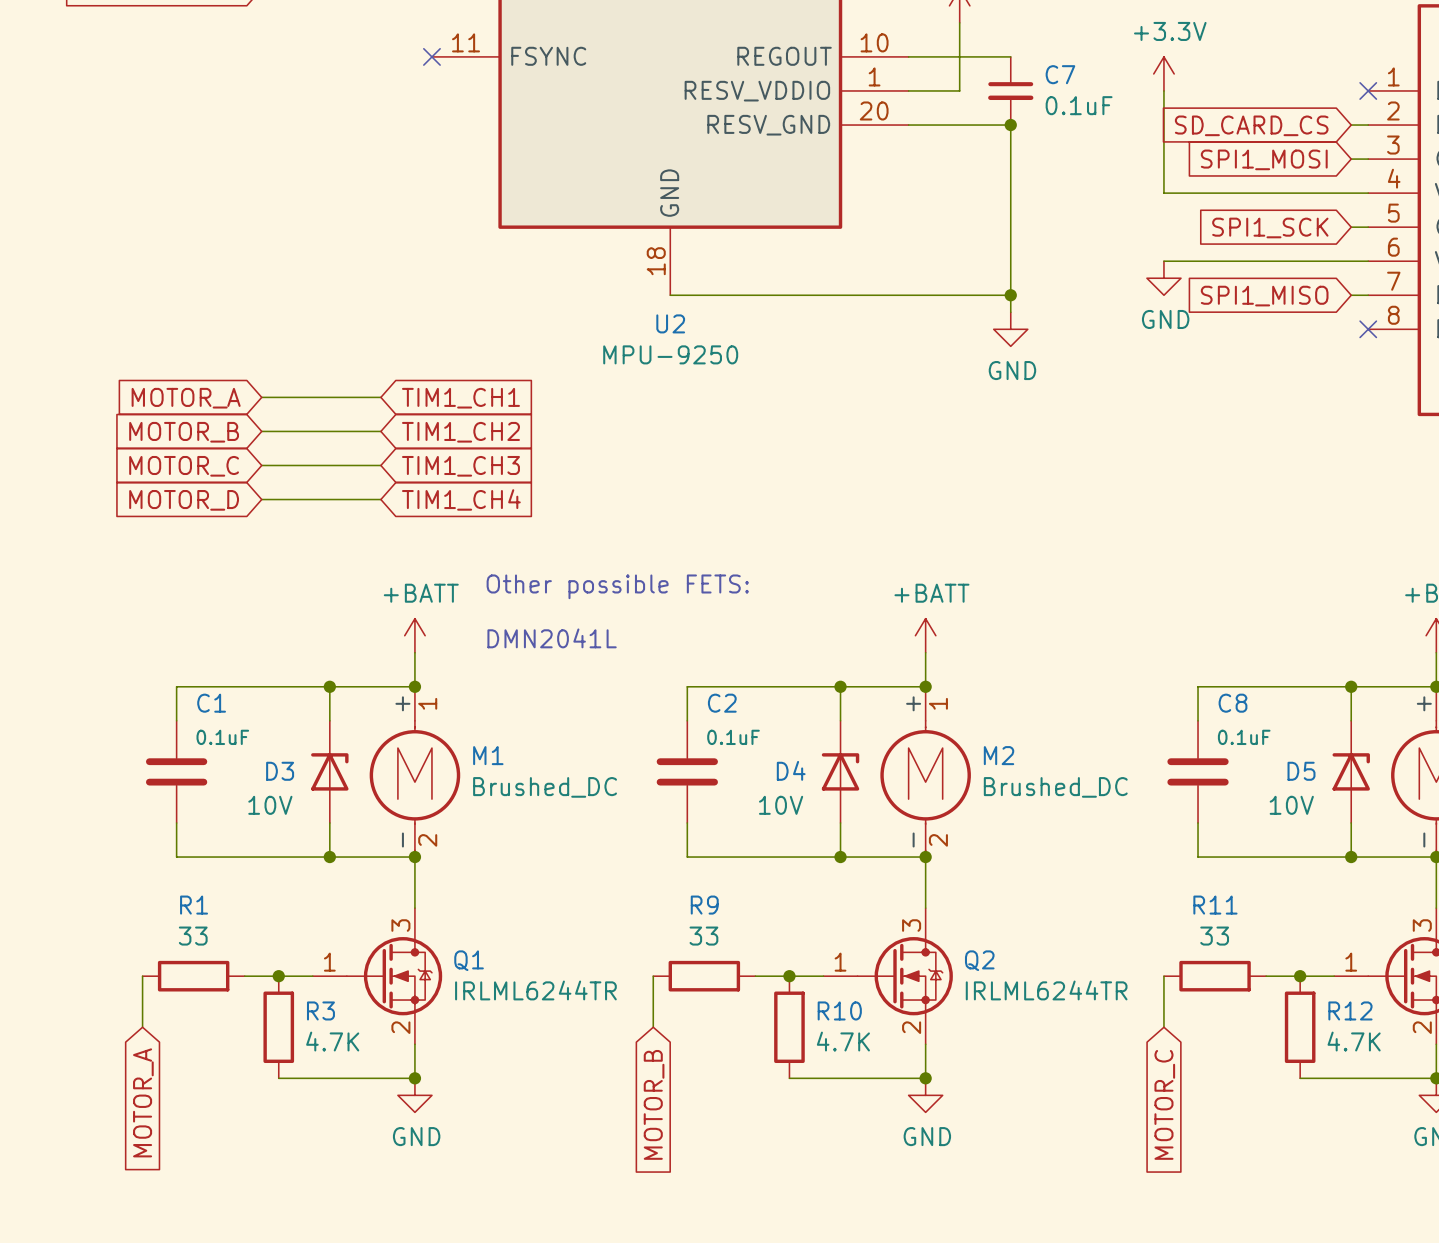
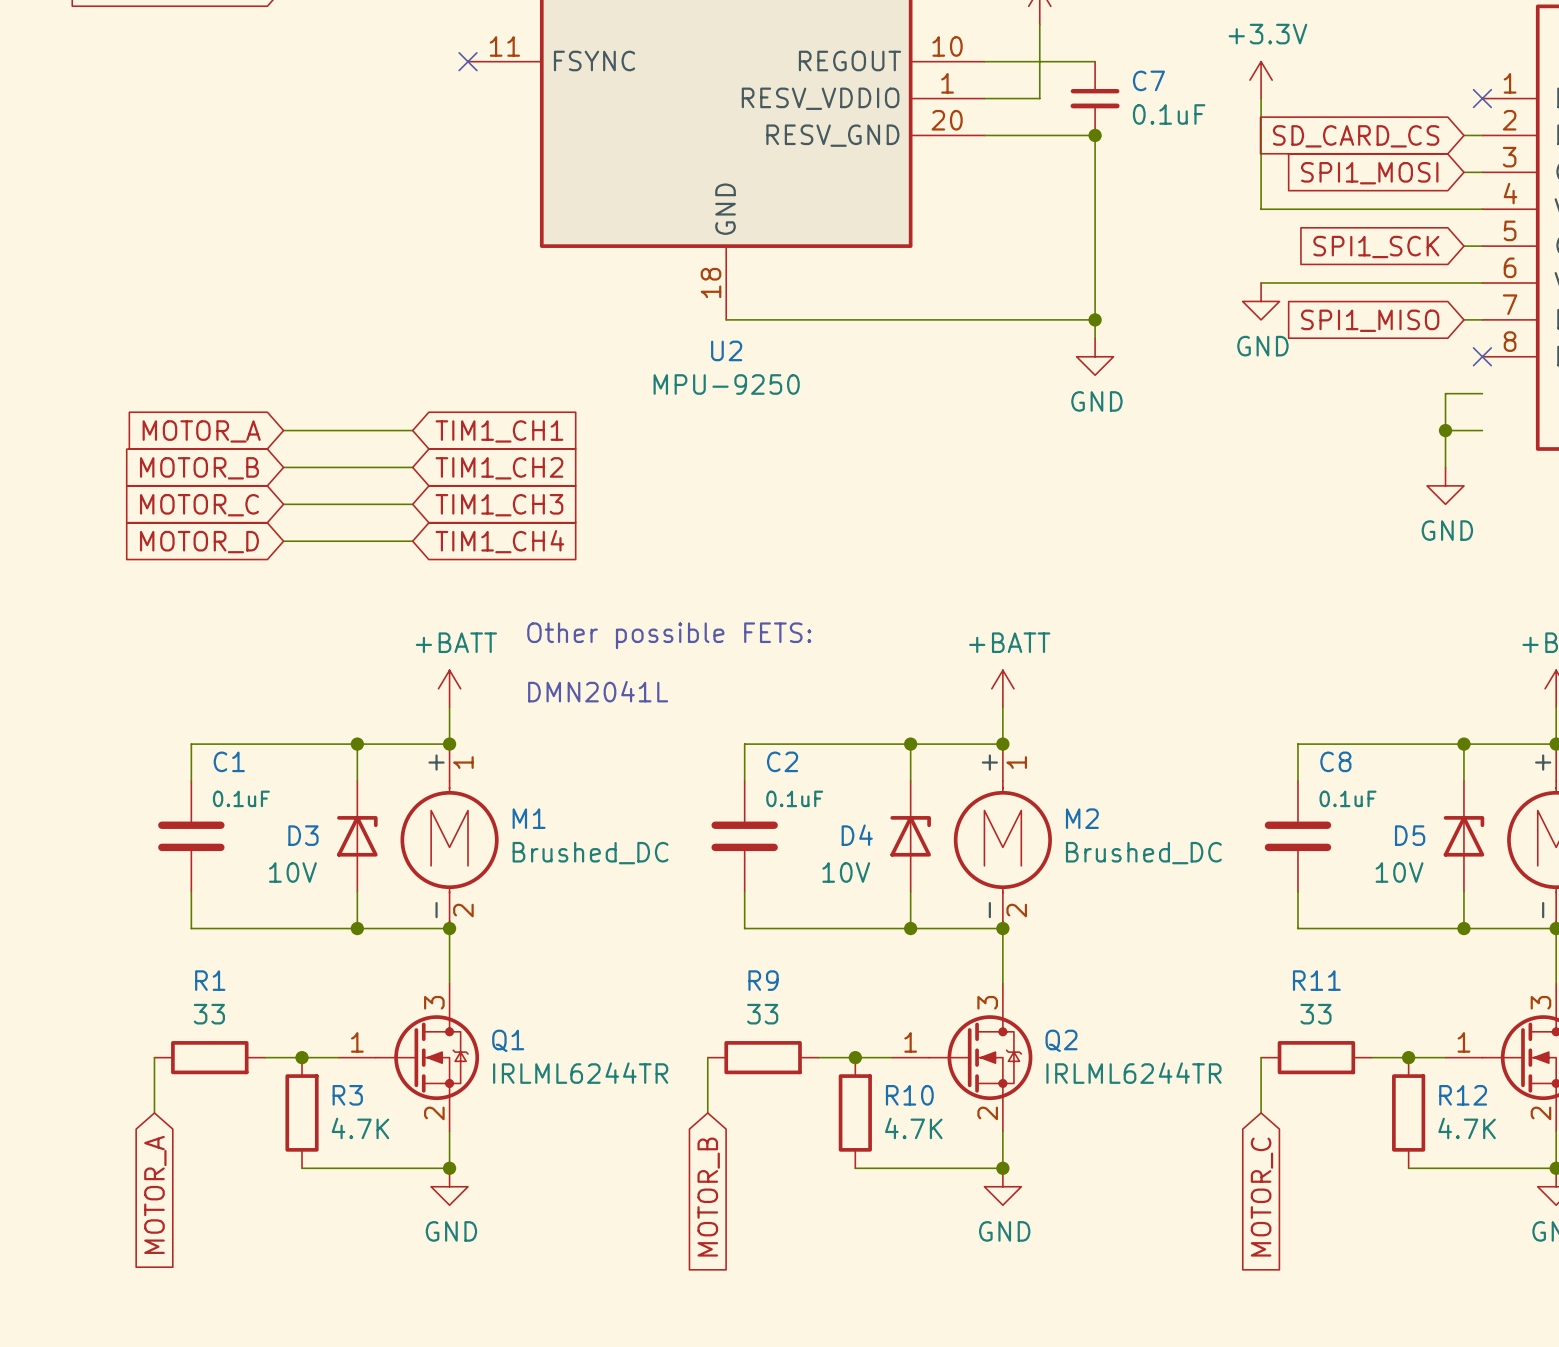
wire: none -> (1482, 393) (1445, 393) (1445, 467)
wire: none -> (1445, 430) (1482, 430)
junction: none -> (1445, 430)
power symbol: none -> GND (1445, 485)

